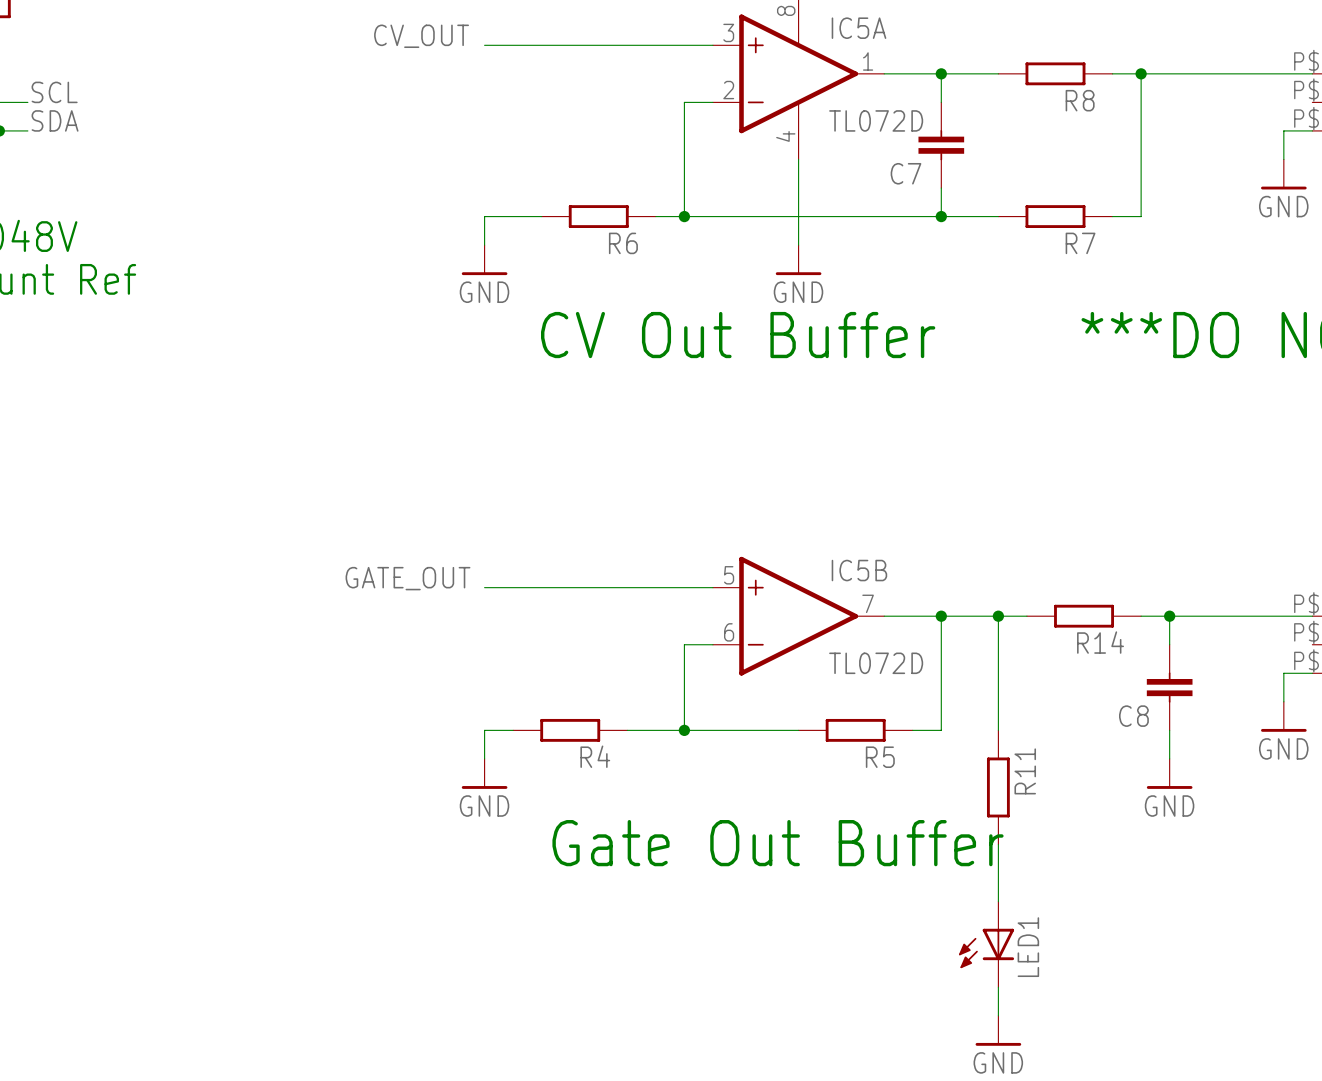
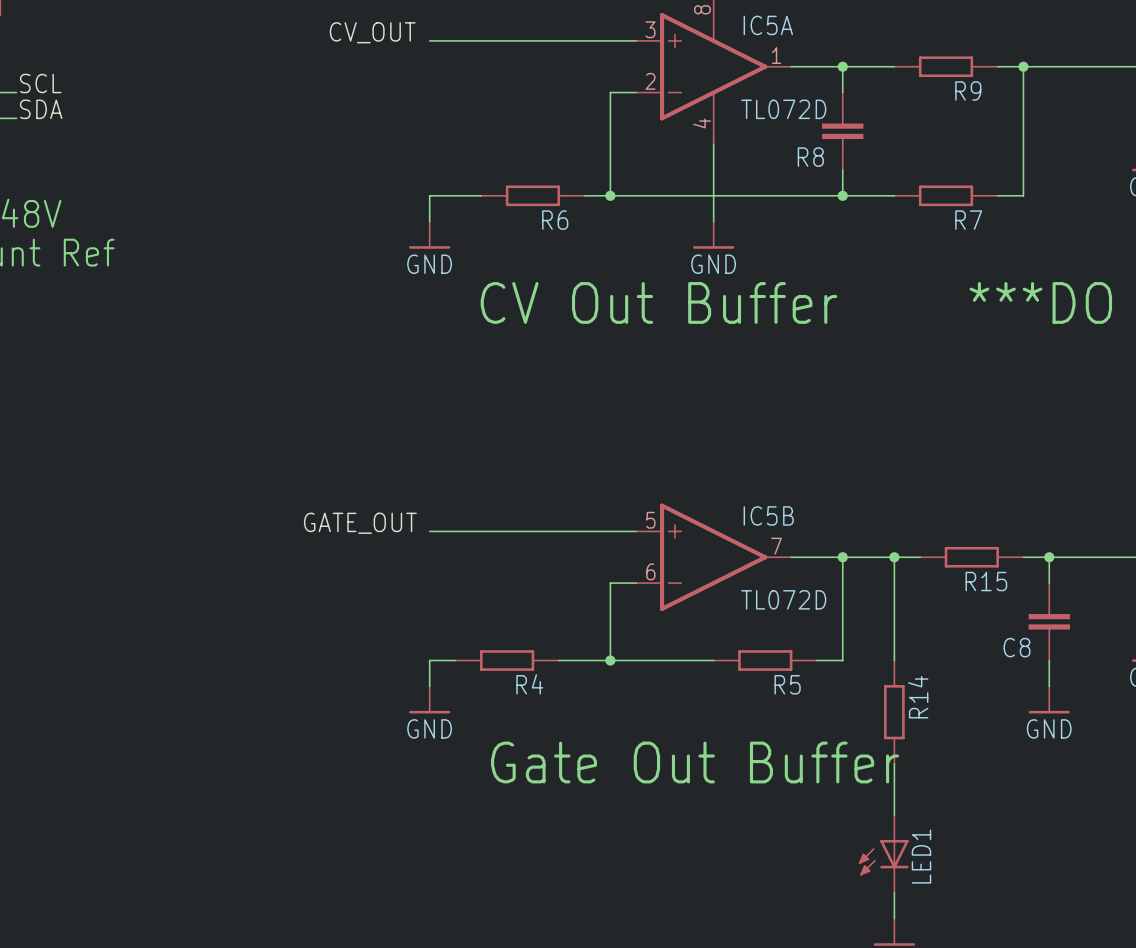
R8 name: R8 (1080, 100) -> R9 (968, 91)
C7 name: C7 (906, 173) -> R8 (810, 157)
R14 name: R14 (1100, 642) -> R15 (986, 581)
R11 name: R11 (1025, 771) -> R14 (918, 697)

